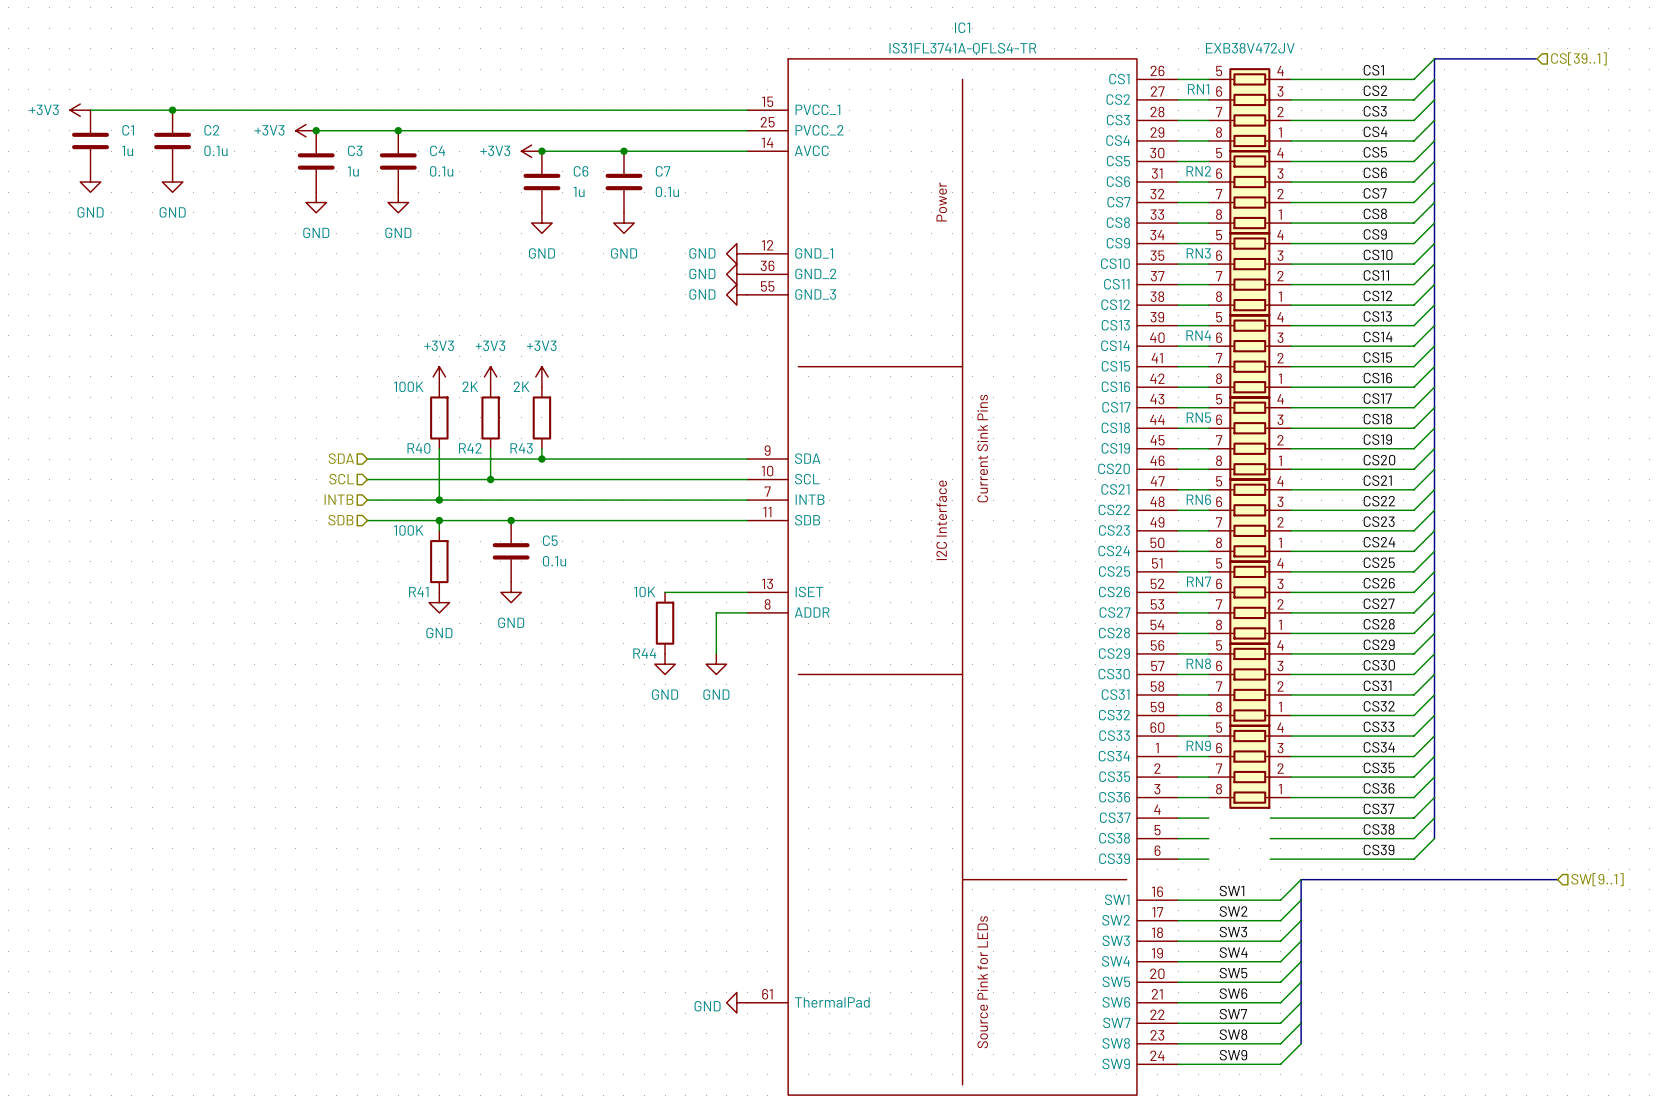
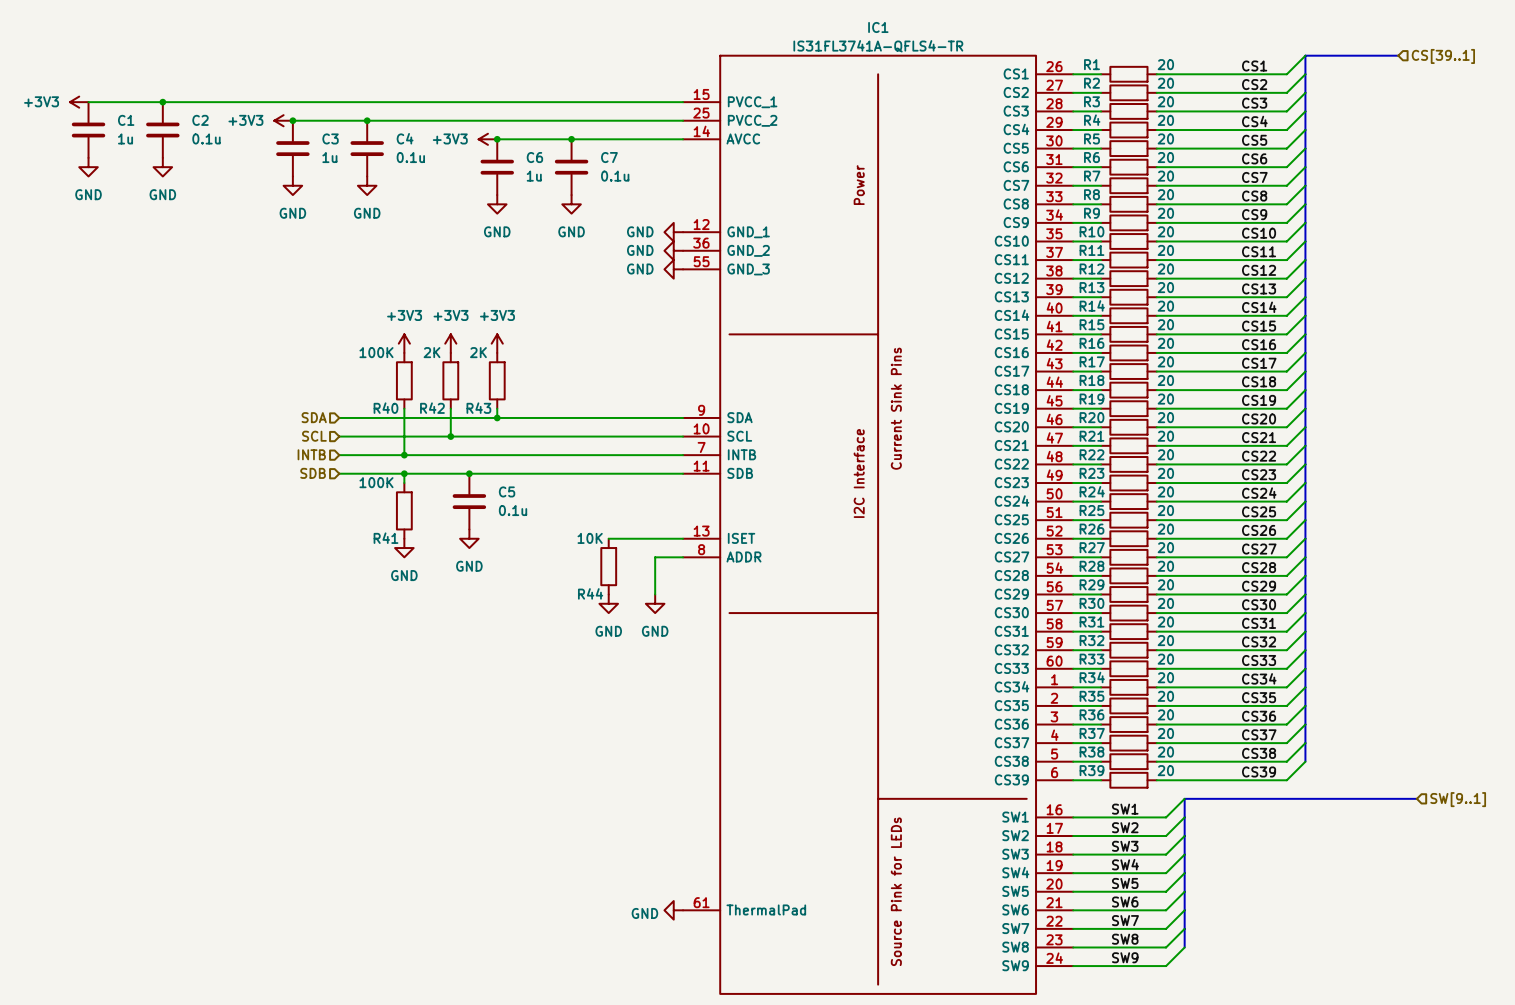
R1: none -> 20 (1128, 74)
R2: none -> 20 (1128, 92)
RN1: EXB38V472JV (1249, 110) -> none
R3: none -> 20 (1128, 111)
R4: none -> 20 (1128, 130)
R5: none -> 20 (1128, 148)
R6: none -> 20 (1128, 167)
RN2: (1249, 192) -> none
R7: none -> 20 (1128, 185)
R8: none -> 20 (1128, 204)
R9: none -> 20 (1128, 222)
R10: none -> 20 (1128, 241)
RN3: (1249, 274) -> none
R11: none -> 20 (1128, 260)
R12: none -> 20 (1128, 278)
R13: none -> 20 (1128, 297)
R14: none -> 20 (1128, 315)
RN4: (1249, 356) -> none
R15: none -> 20 (1128, 334)
R16: none -> 20 (1128, 352)
R17: none -> 20 (1128, 371)
R18: none -> 20 (1128, 390)
RN5: (1249, 438) -> none
R19: none -> 20 (1128, 408)
R20: none -> 20 (1128, 427)
R21: none -> 20 (1128, 445)
R22: none -> 20 (1128, 464)
RN6: (1249, 520) -> none
R23: none -> 20 (1128, 483)
R24: none -> 20 (1128, 501)
R25: none -> 20 (1128, 520)
R26: none -> 20 (1128, 538)
RN7: (1249, 602) -> none
R27: none -> 20 (1128, 557)
R28: none -> 20 (1128, 575)
R29: none -> 20 (1128, 594)
R30: none -> 20 (1128, 613)
RN8: (1249, 684) -> none
R31: none -> 20 (1128, 631)
R32: none -> 20 (1128, 650)
R33: none -> 20 (1128, 668)
R34: none -> 20 (1128, 687)
RN9: (1249, 766) -> none
R35: none -> 20 (1128, 705)
R36: none -> 20 (1128, 724)
R37: none -> 20 (1128, 743)
R38: none -> 20 (1128, 761)
R39: none -> 20 (1128, 780)

